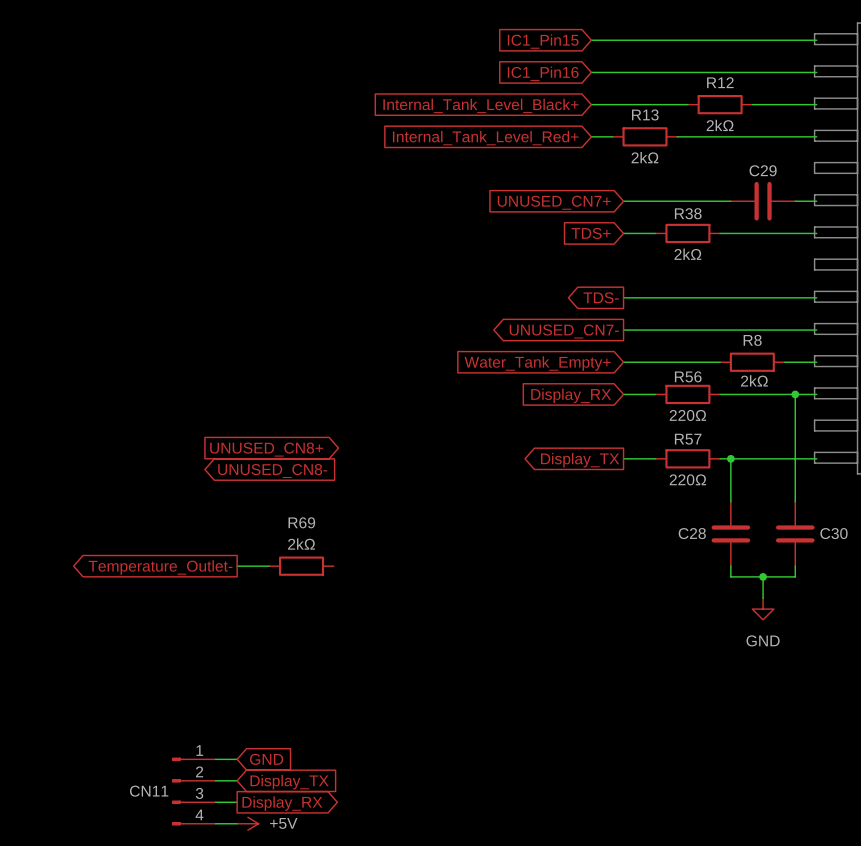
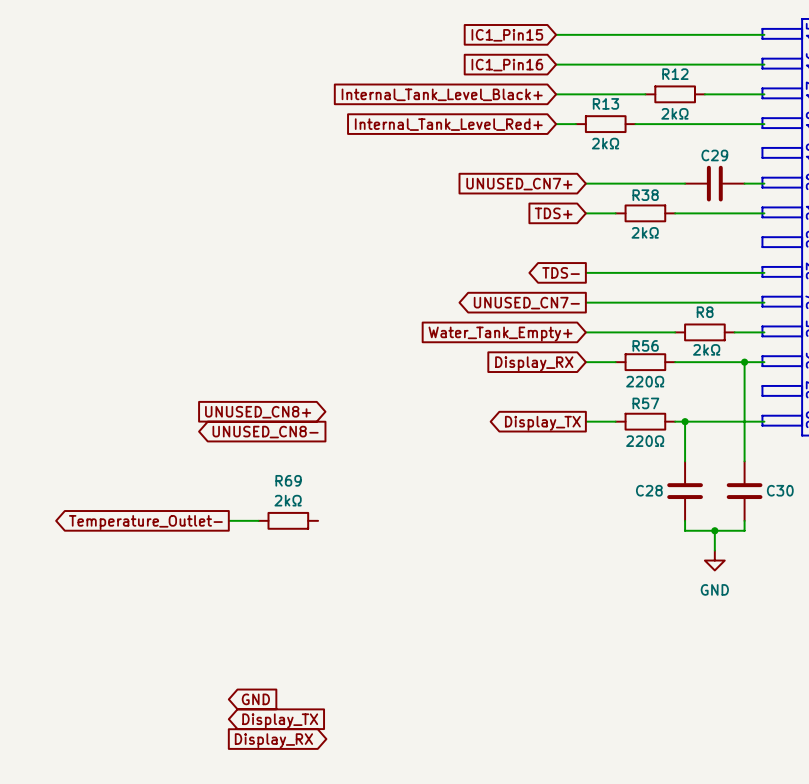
wire: (215, 759) (237, 759) -> none
wire: (215, 780) (237, 780) -> none
CN11: (193, 791) -> none
wire: (215, 802) (237, 802) -> none
wire: (215, 823) (237, 823) -> none
power symbol: +5V (247, 823) -> none

